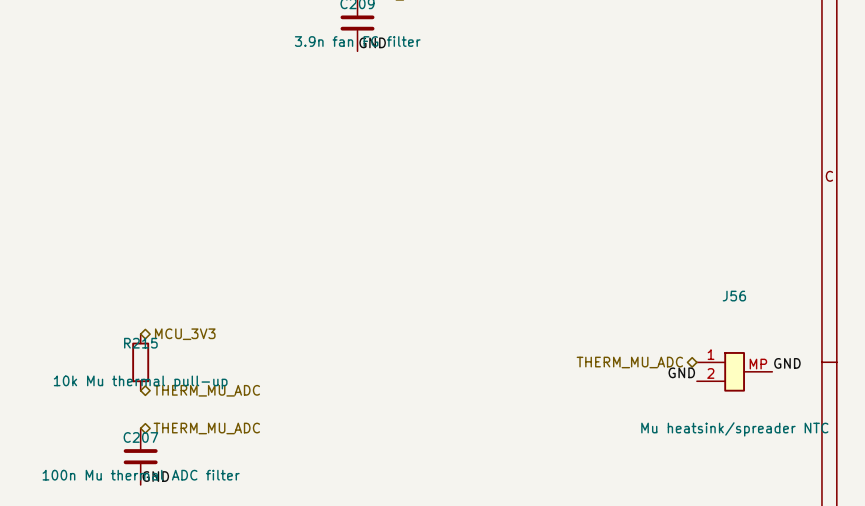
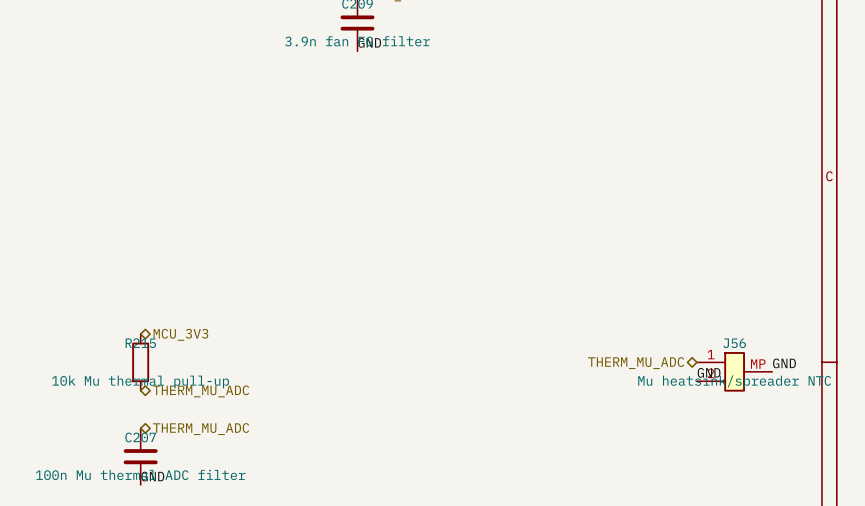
J56 name position: J56 (734, 296) -> J56 (734, 343)
label position: GND (681, 372) -> GND (709, 372)
J56 value position: Mu heatsink/spreader NTC (734, 429) -> Mu heatsink/spreader NTC (734, 381)

